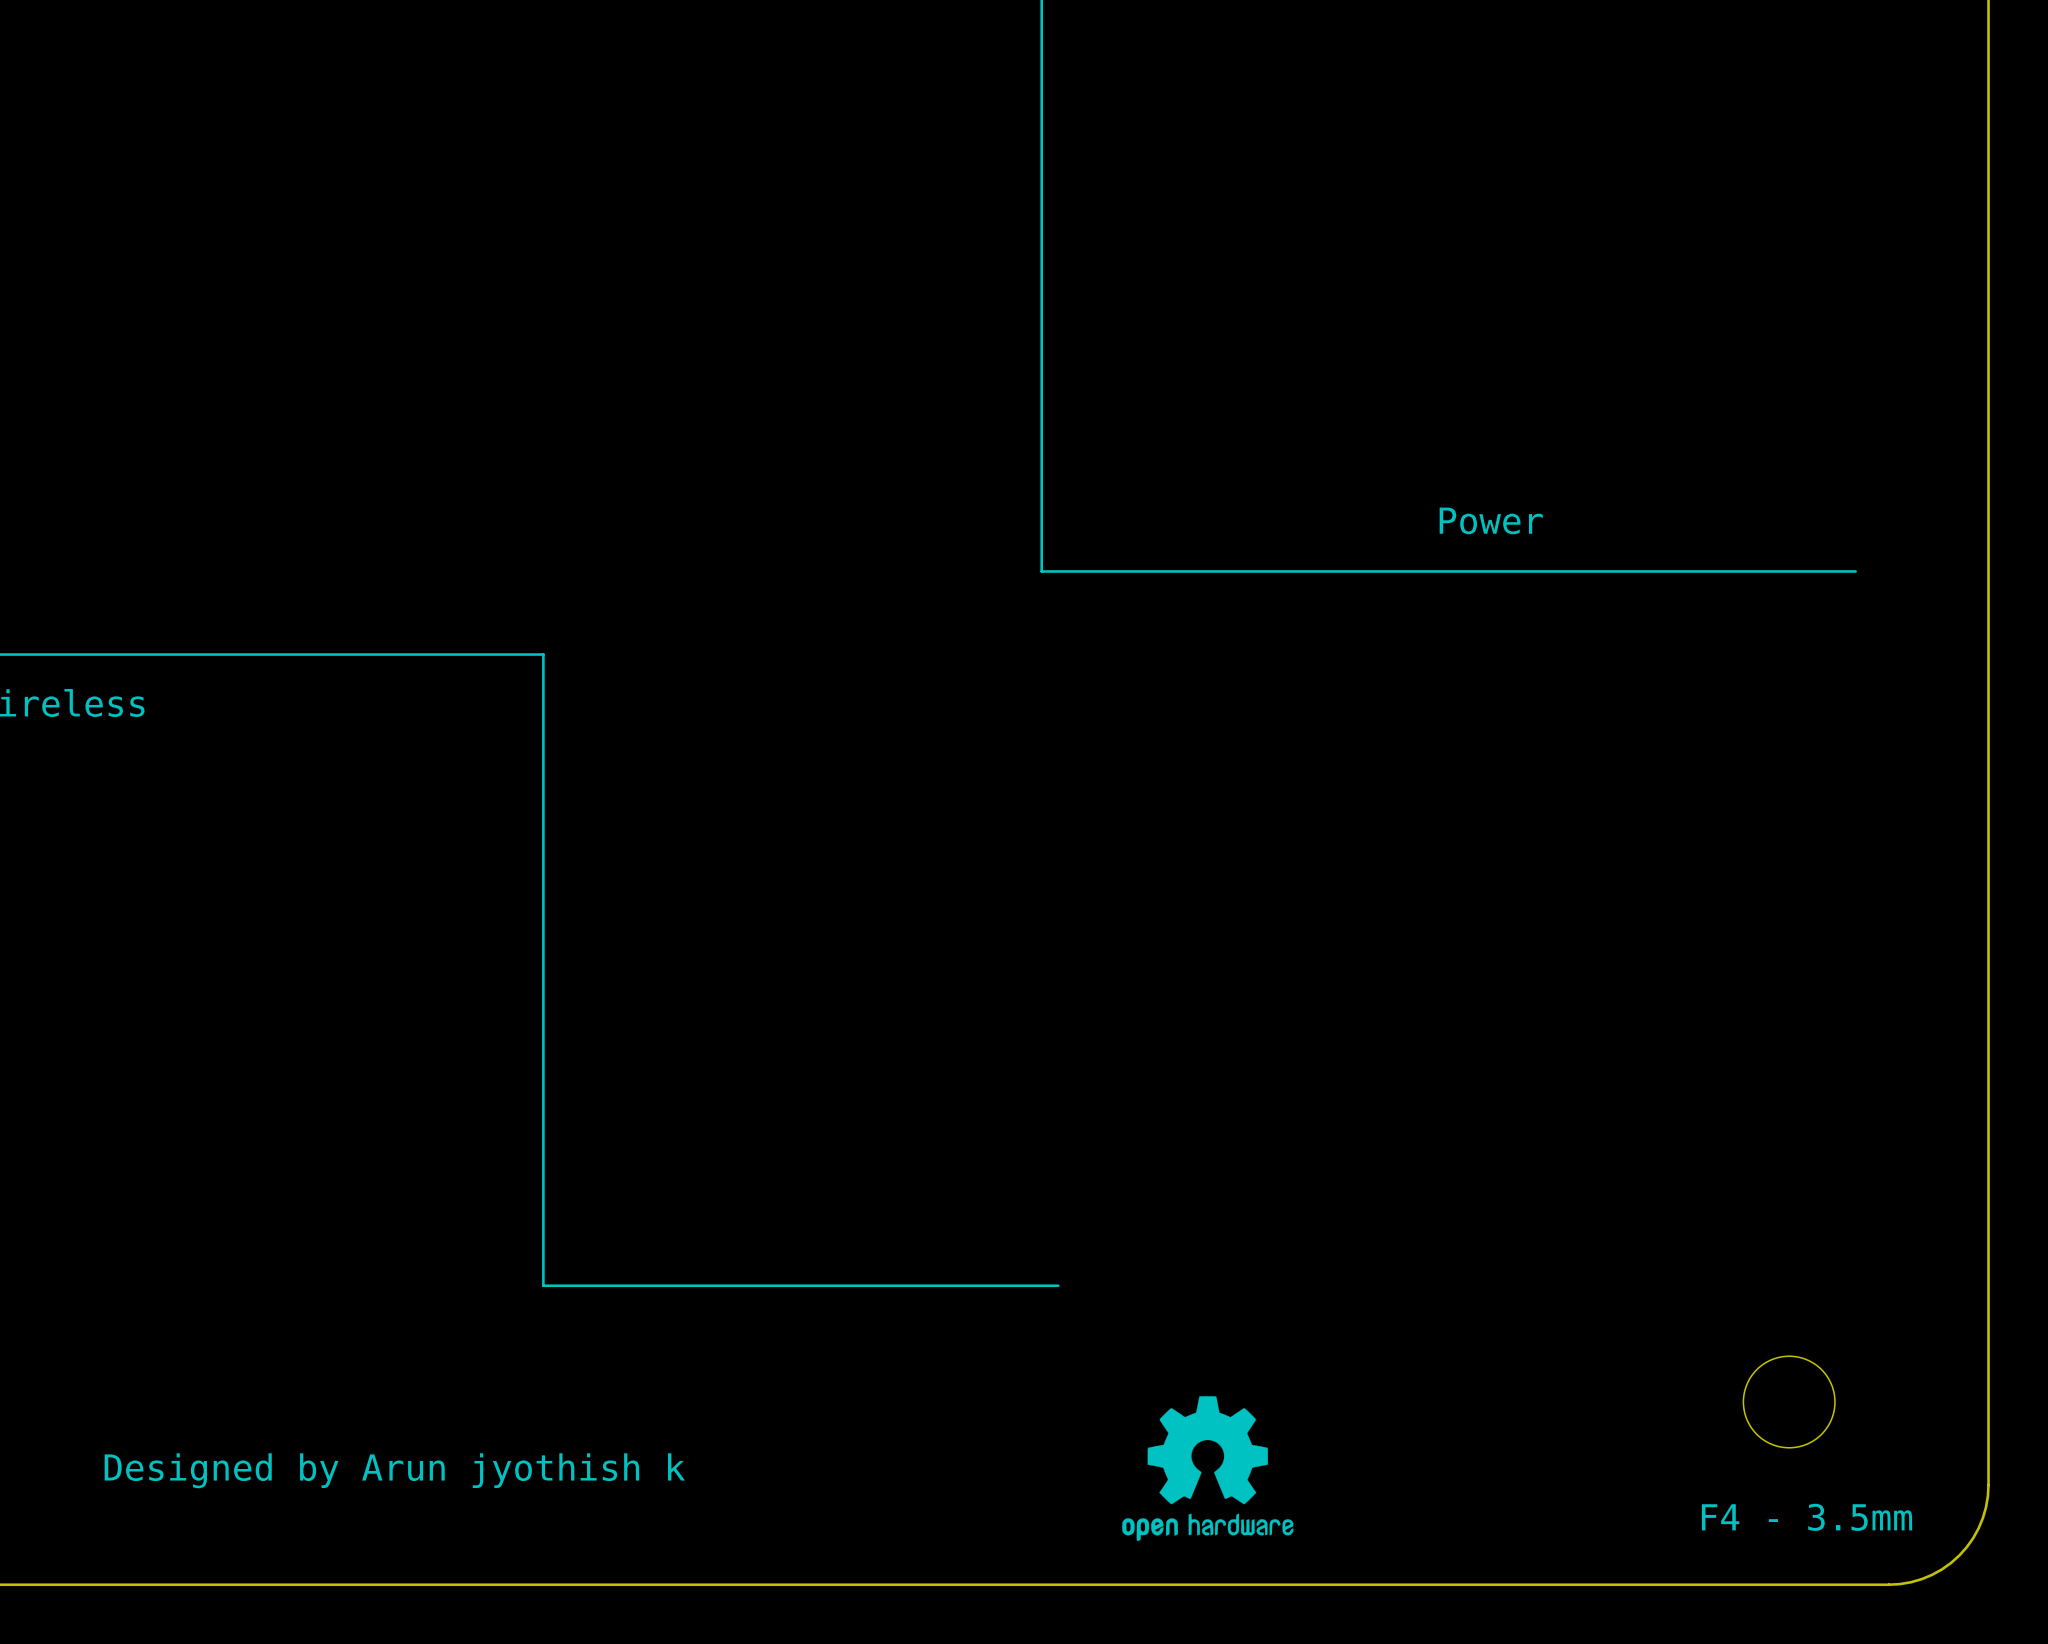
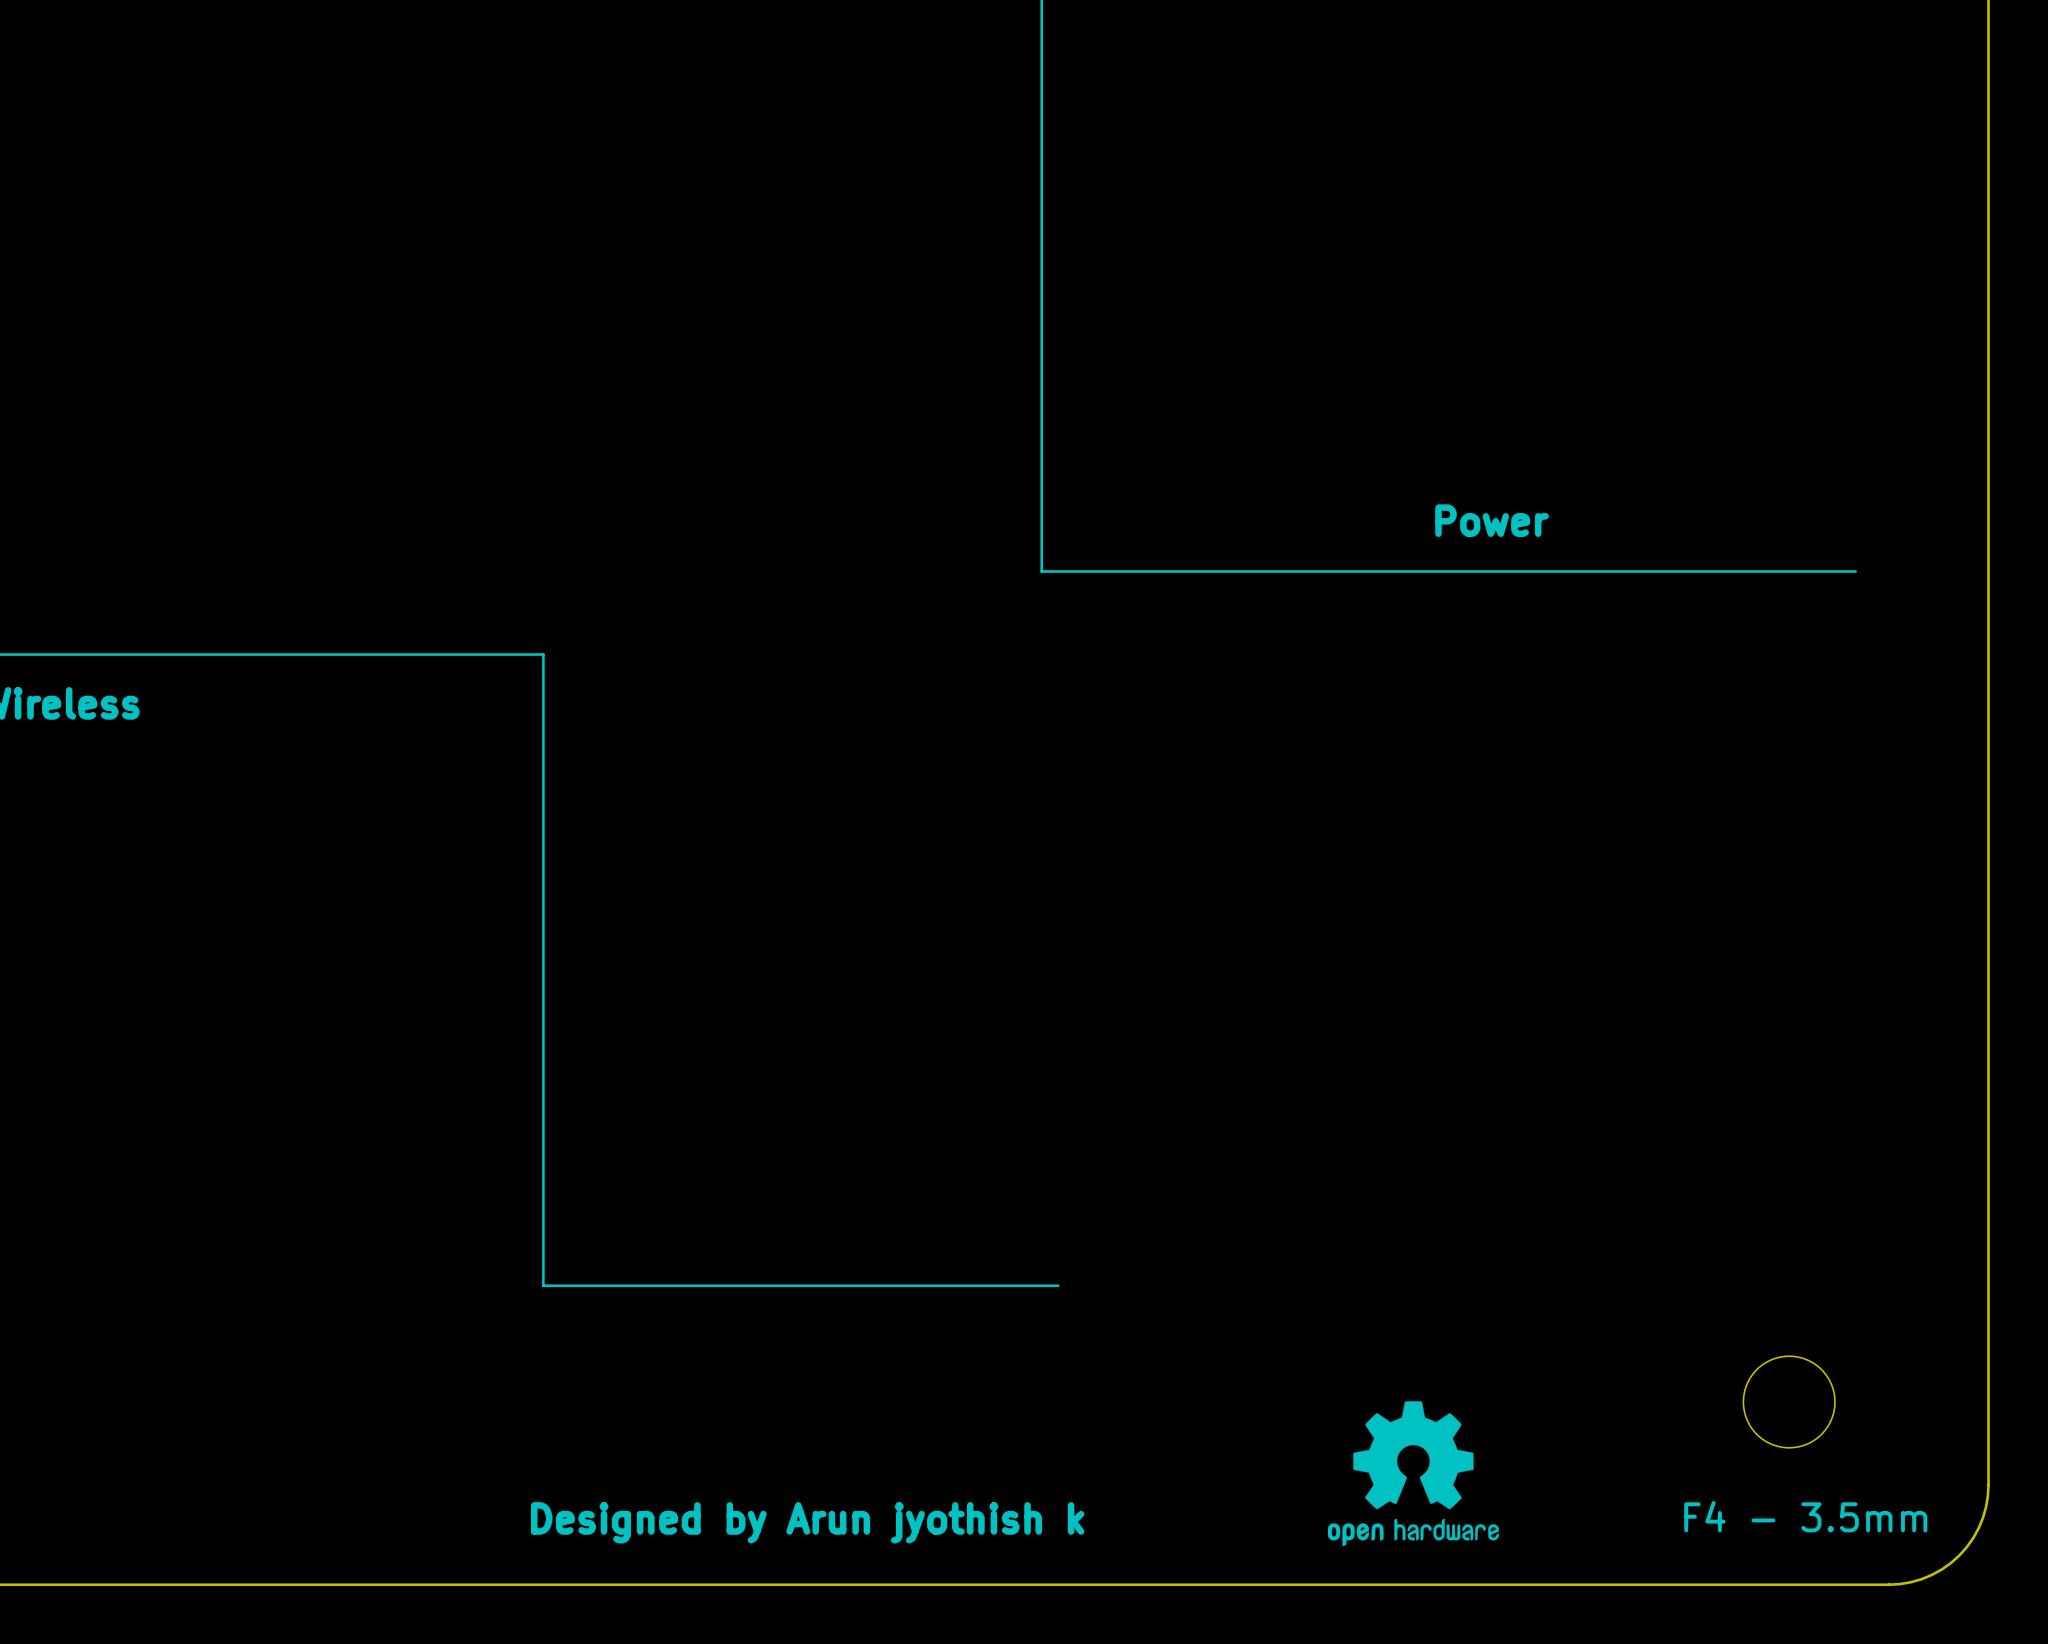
drawing position: (1207, 1468) -> (1413, 1473)
text position: Designed by Arun jyothish k (394, 1470) -> Designed by Arun jyothish k (807, 1522)

